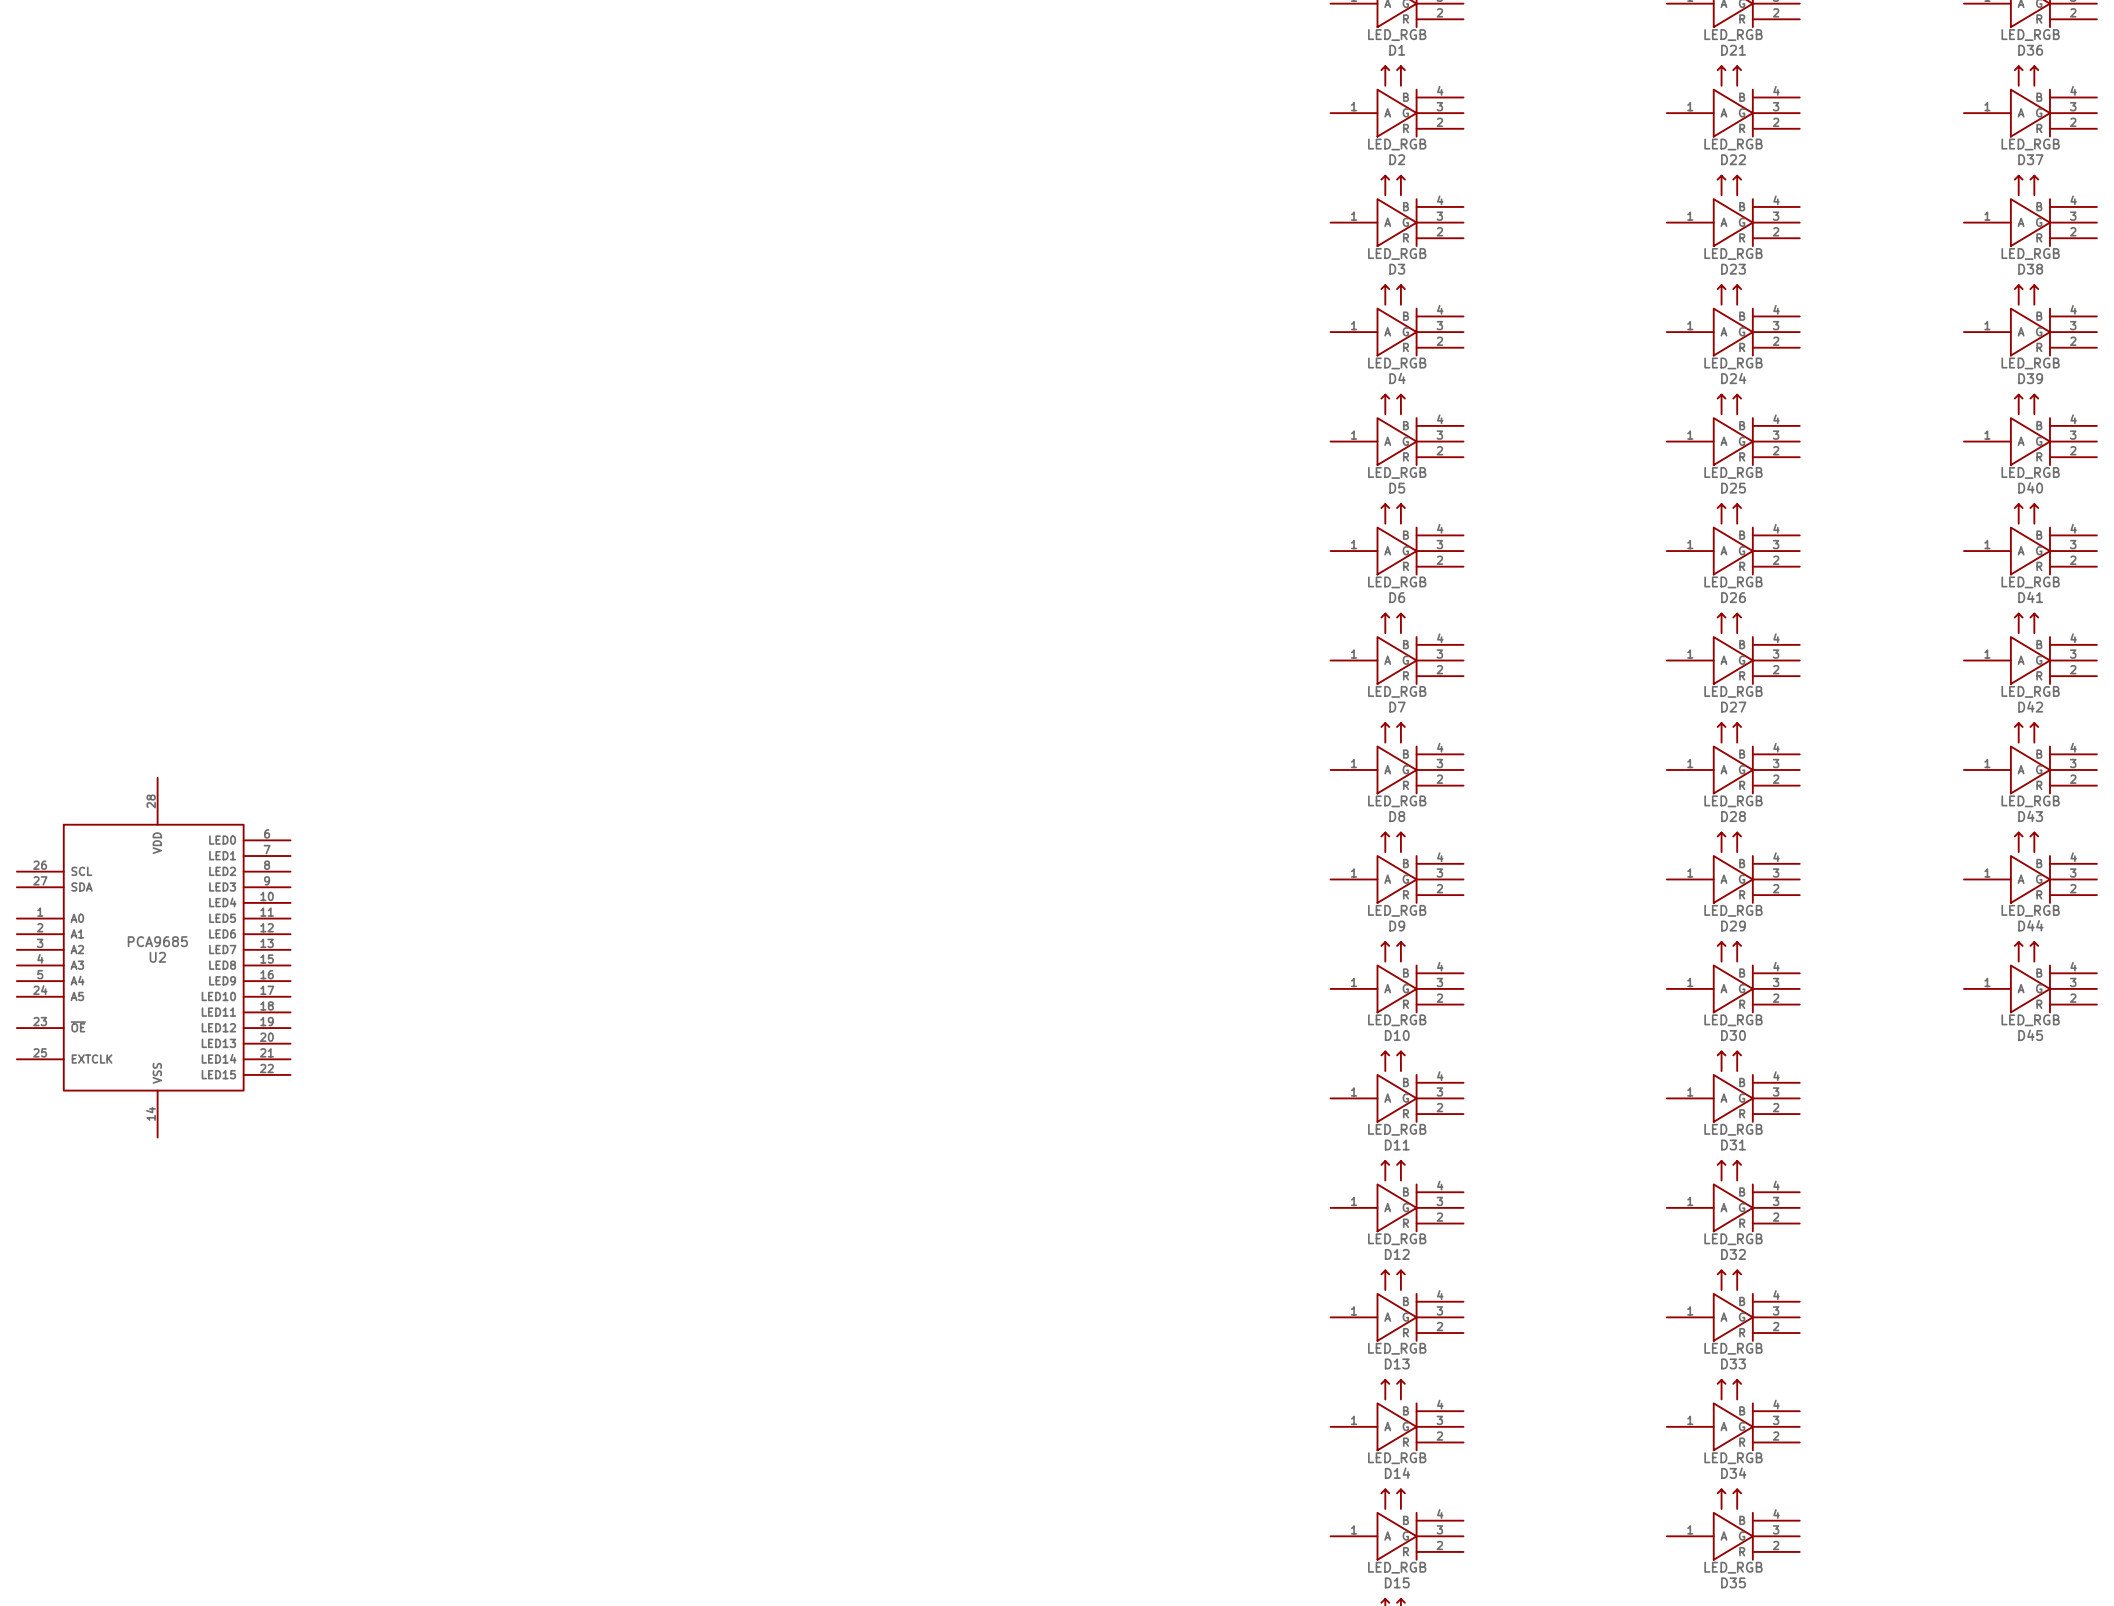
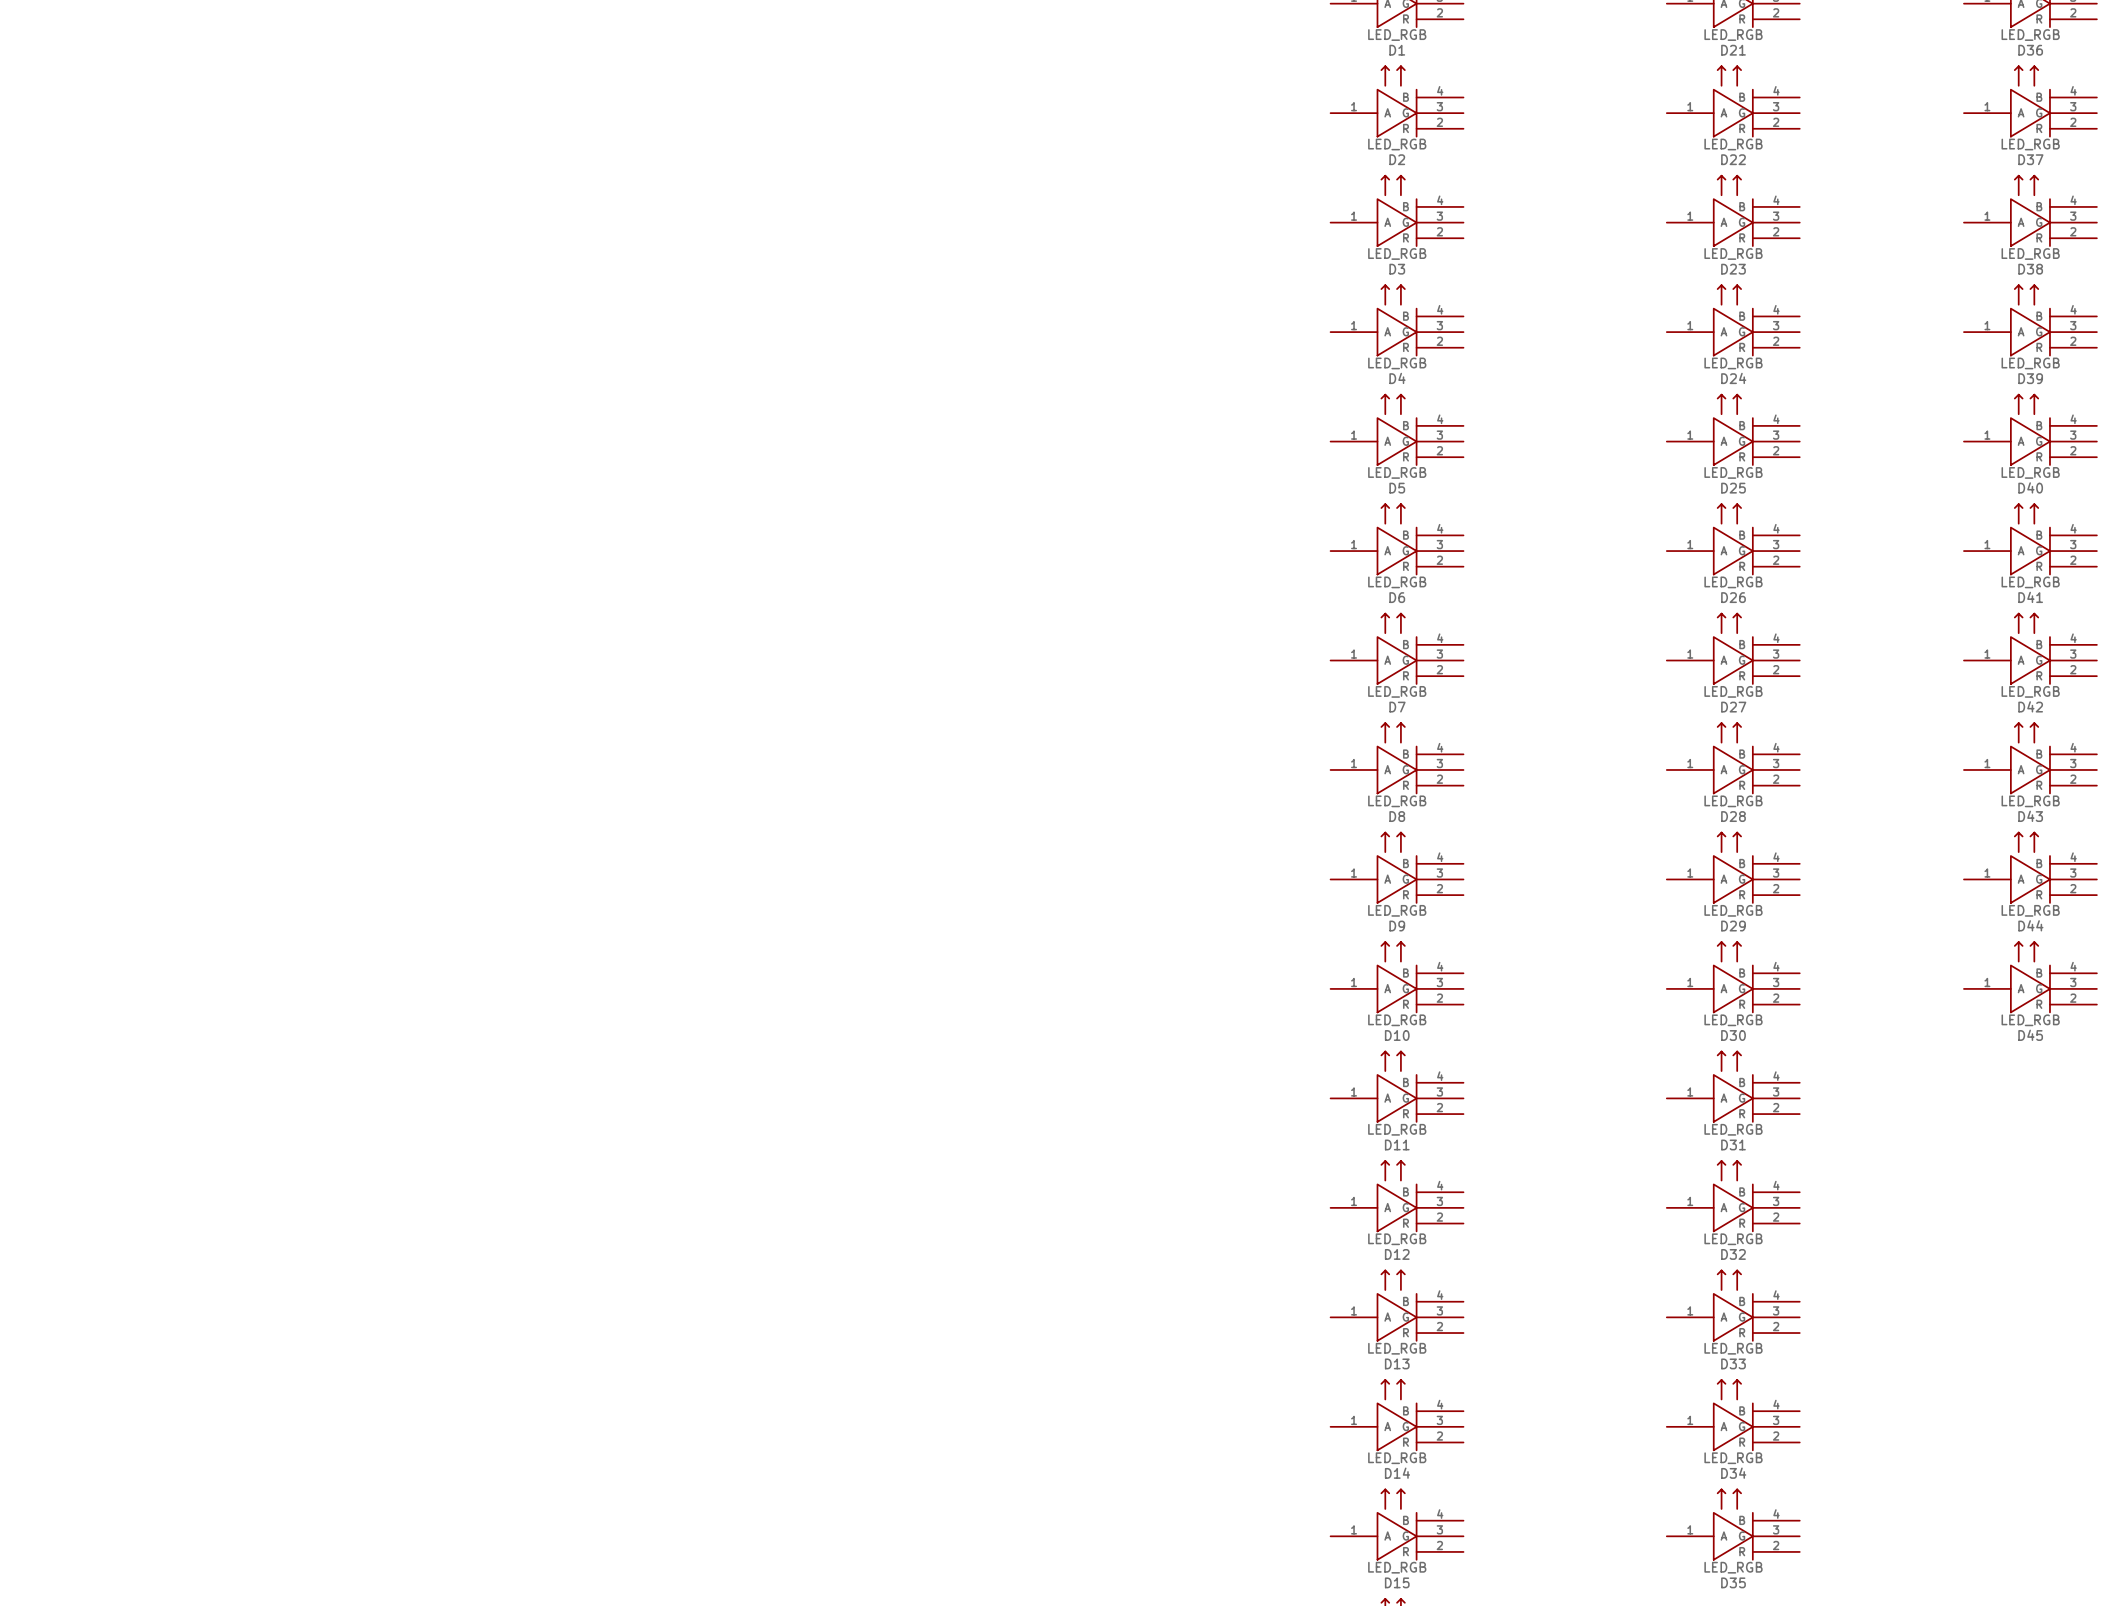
U2: PCA9685 (153, 957) -> none

